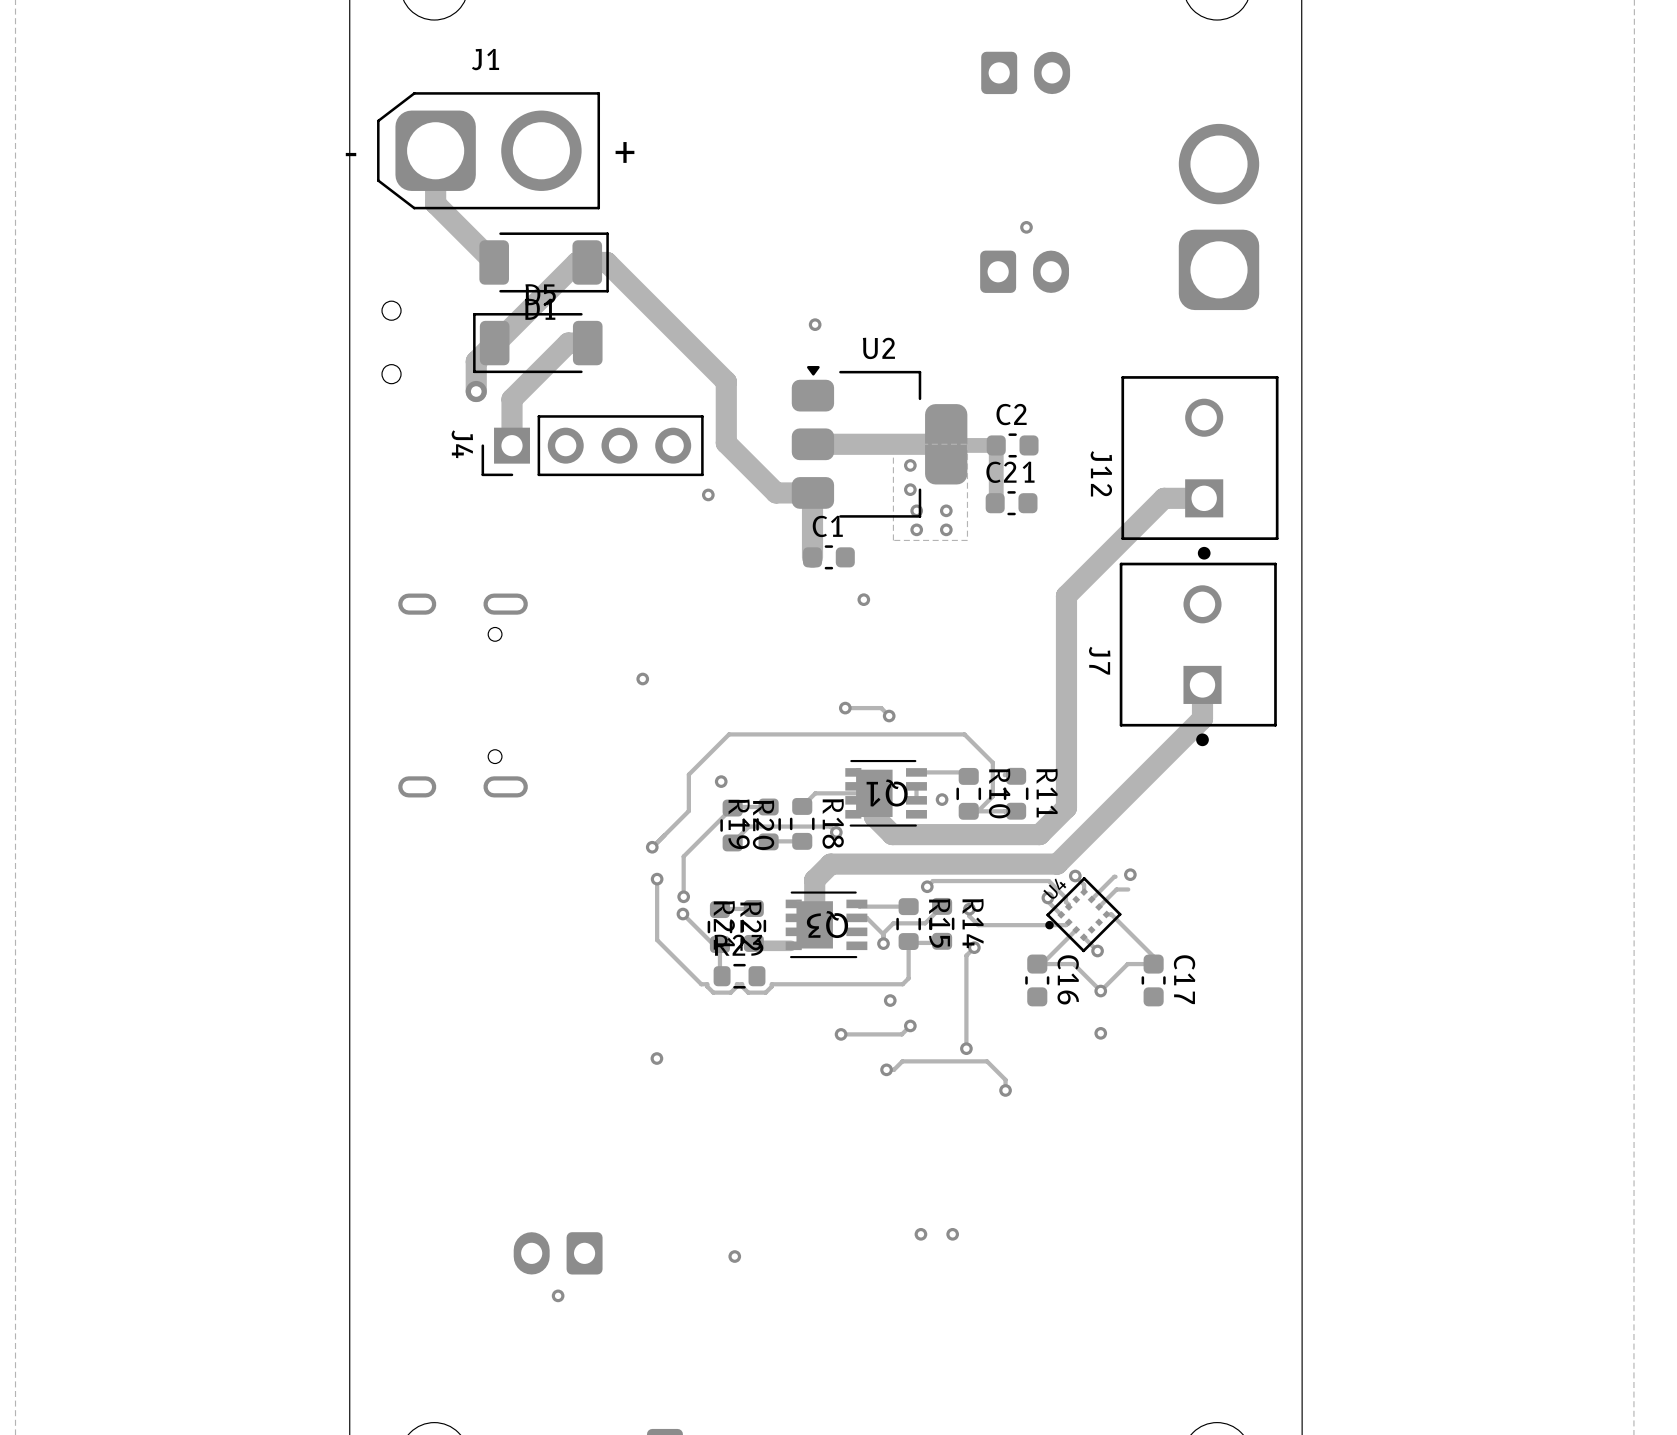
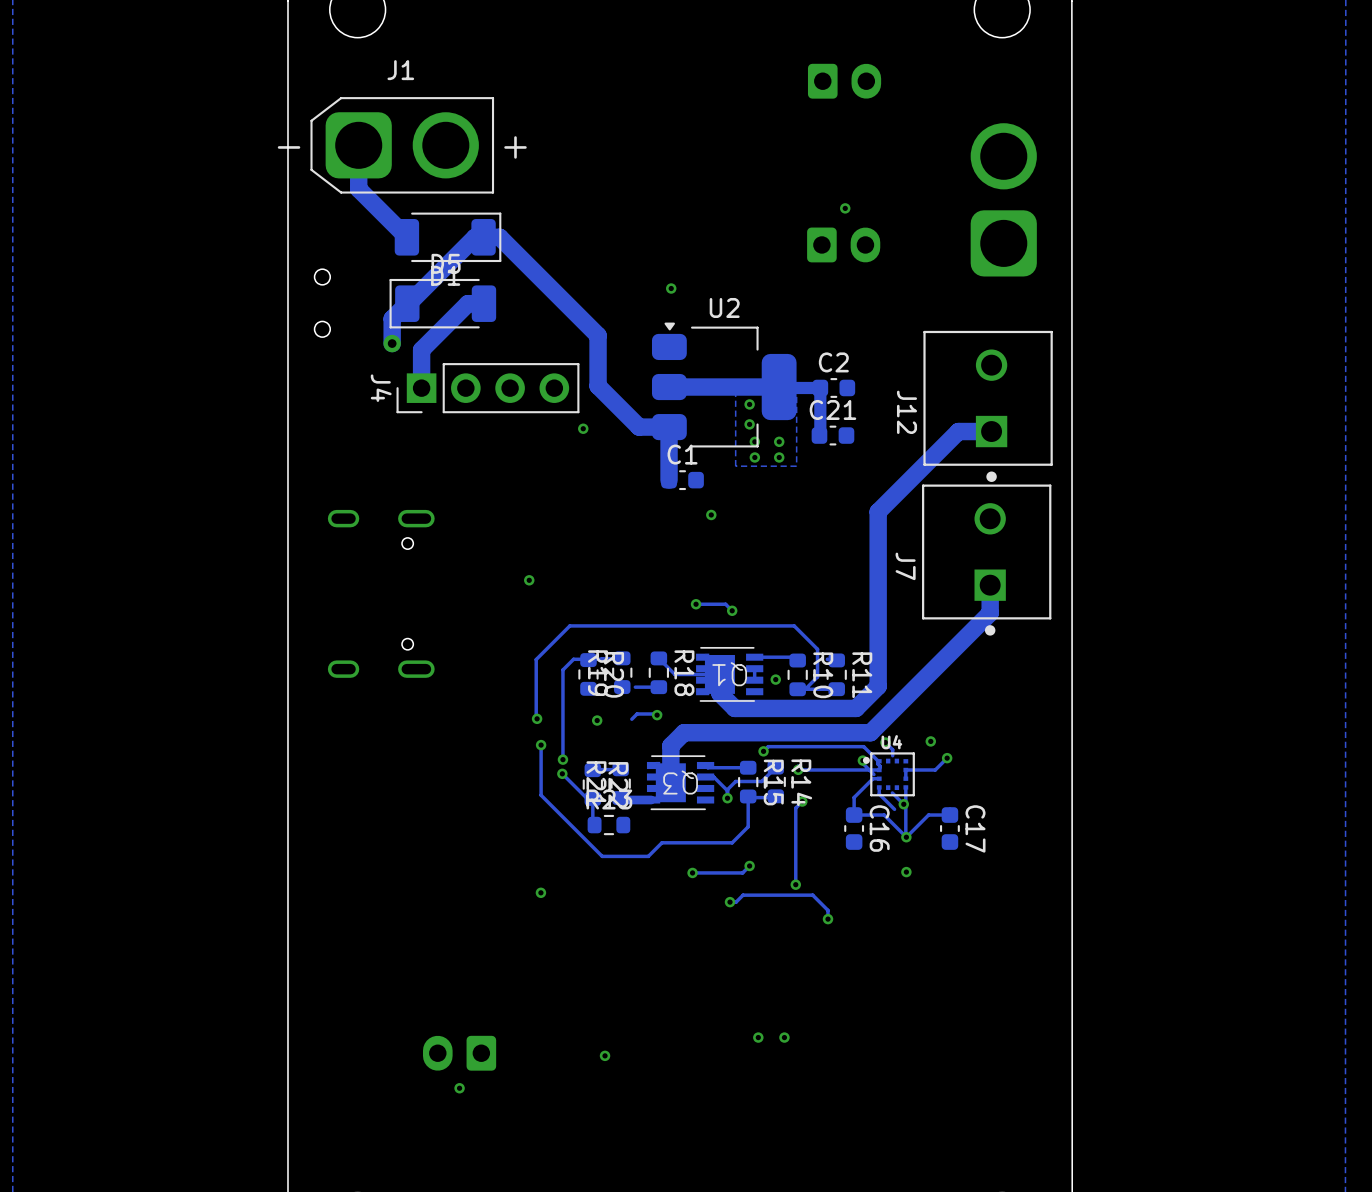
track: (729, 734) (688, 774) (688, 811) (652, 847) -> (600, 625) (569, 625) (536, 659) (537, 718)
via: (721, 781) -> none
track: (819, 793) (815, 793) (802, 806) -> (674, 674) (658, 658)
track: none -> (658, 687) (635, 687)
track: (767, 812) (761, 806) (733, 806) (683, 856) -> (625, 658) (573, 659) (562, 669) (562, 726)
R18 position: (802, 823) -> (658, 672)
R19 position: (768, 824) -> (622, 672)
R20 position: (732, 825) -> (588, 674)
track: (836, 832) (830, 826) (749, 826) (732, 842) -> none
via position: (836, 832) -> (657, 715)
via: none -> (597, 720)
track: (1115, 876) (1091, 899) -> none
track: (1128, 889) (1116, 889) (1099, 907) -> none
track: none -> (947, 758) (935, 769) (905, 769) (905, 778)
via: none -> (947, 758)
track: none -> (798, 765) (802, 769) (879, 769)
track: (969, 909) (969, 916) (978, 925) (1065, 925) (1068, 922) -> none
U4 rotation: 0° (1083, 914) -> 45° clockwise (888, 774)
track: (1106, 914) (1111, 914) (1153, 956) -> none
track: none -> (879, 778) (872, 778) (854, 797) (854, 815)
track: (1076, 929) (1042, 964) -> none
track: none -> (879, 787) (879, 794) (894, 809)
track: none -> (905, 787) (905, 836)
track: (902, 984) (771, 984) (765, 992) (748, 992) (742, 984) (736, 984) (730, 992) (713, 992) (707, 984) (701, 984) -> (743, 831) (732, 842) (661, 842) (648, 856) (602, 856) (577, 831)
via: (890, 1000) -> none

